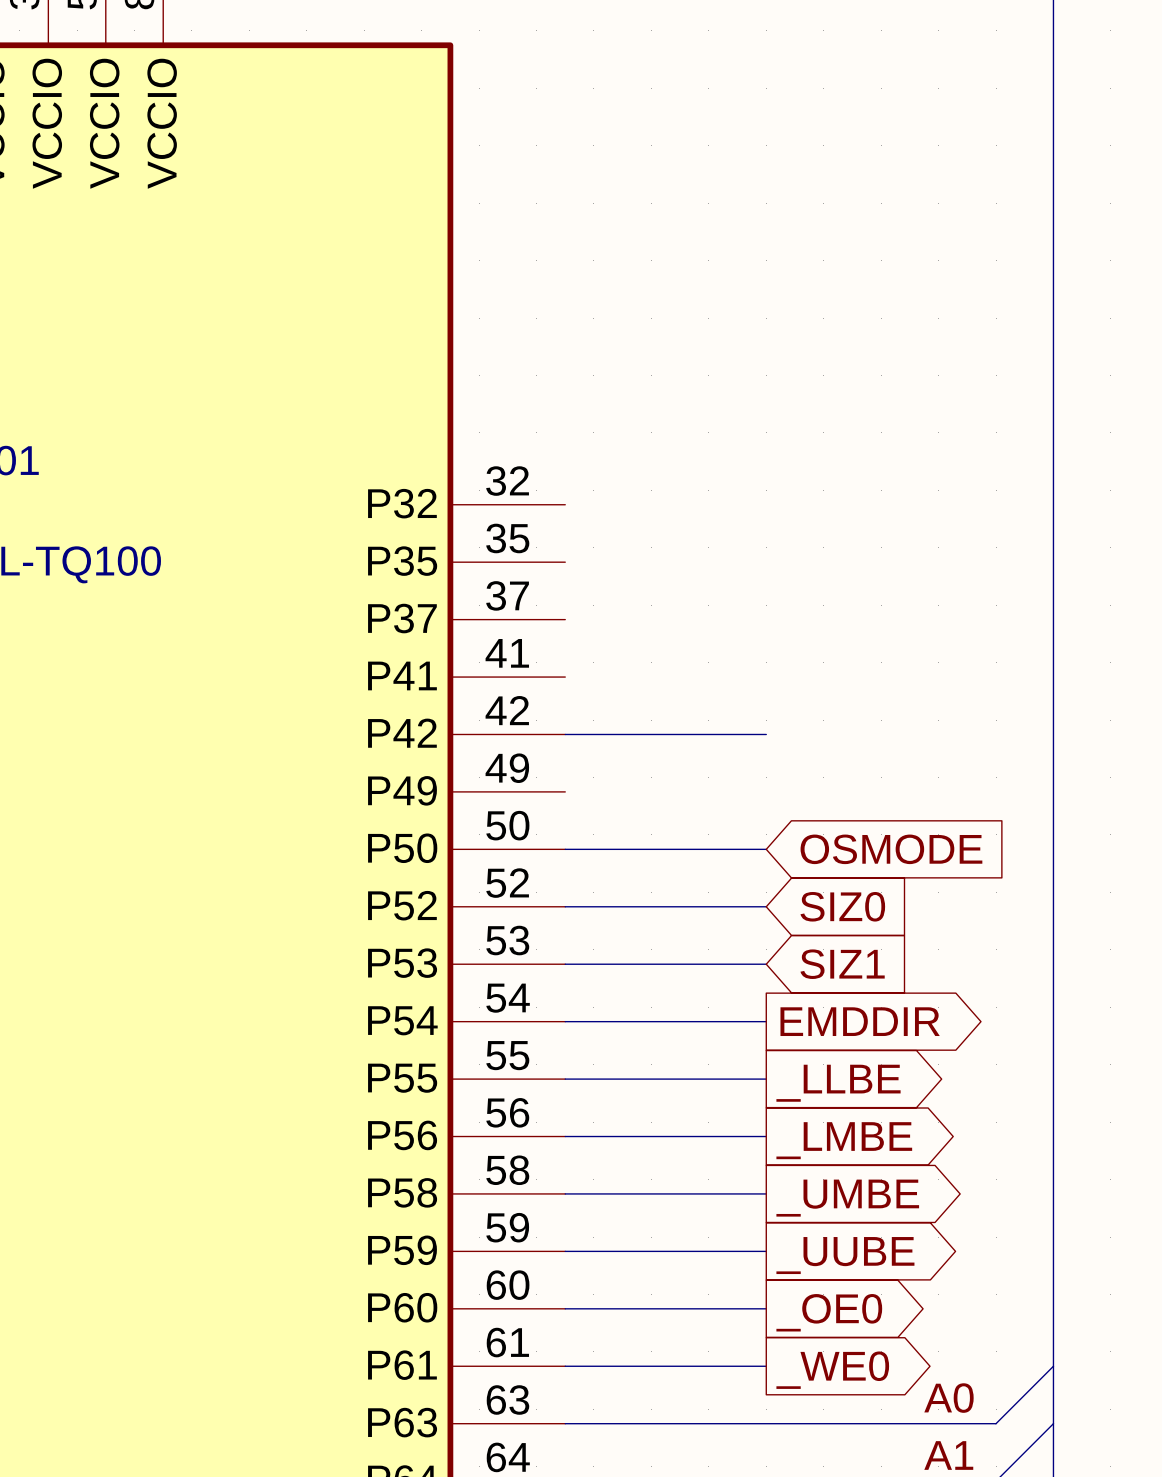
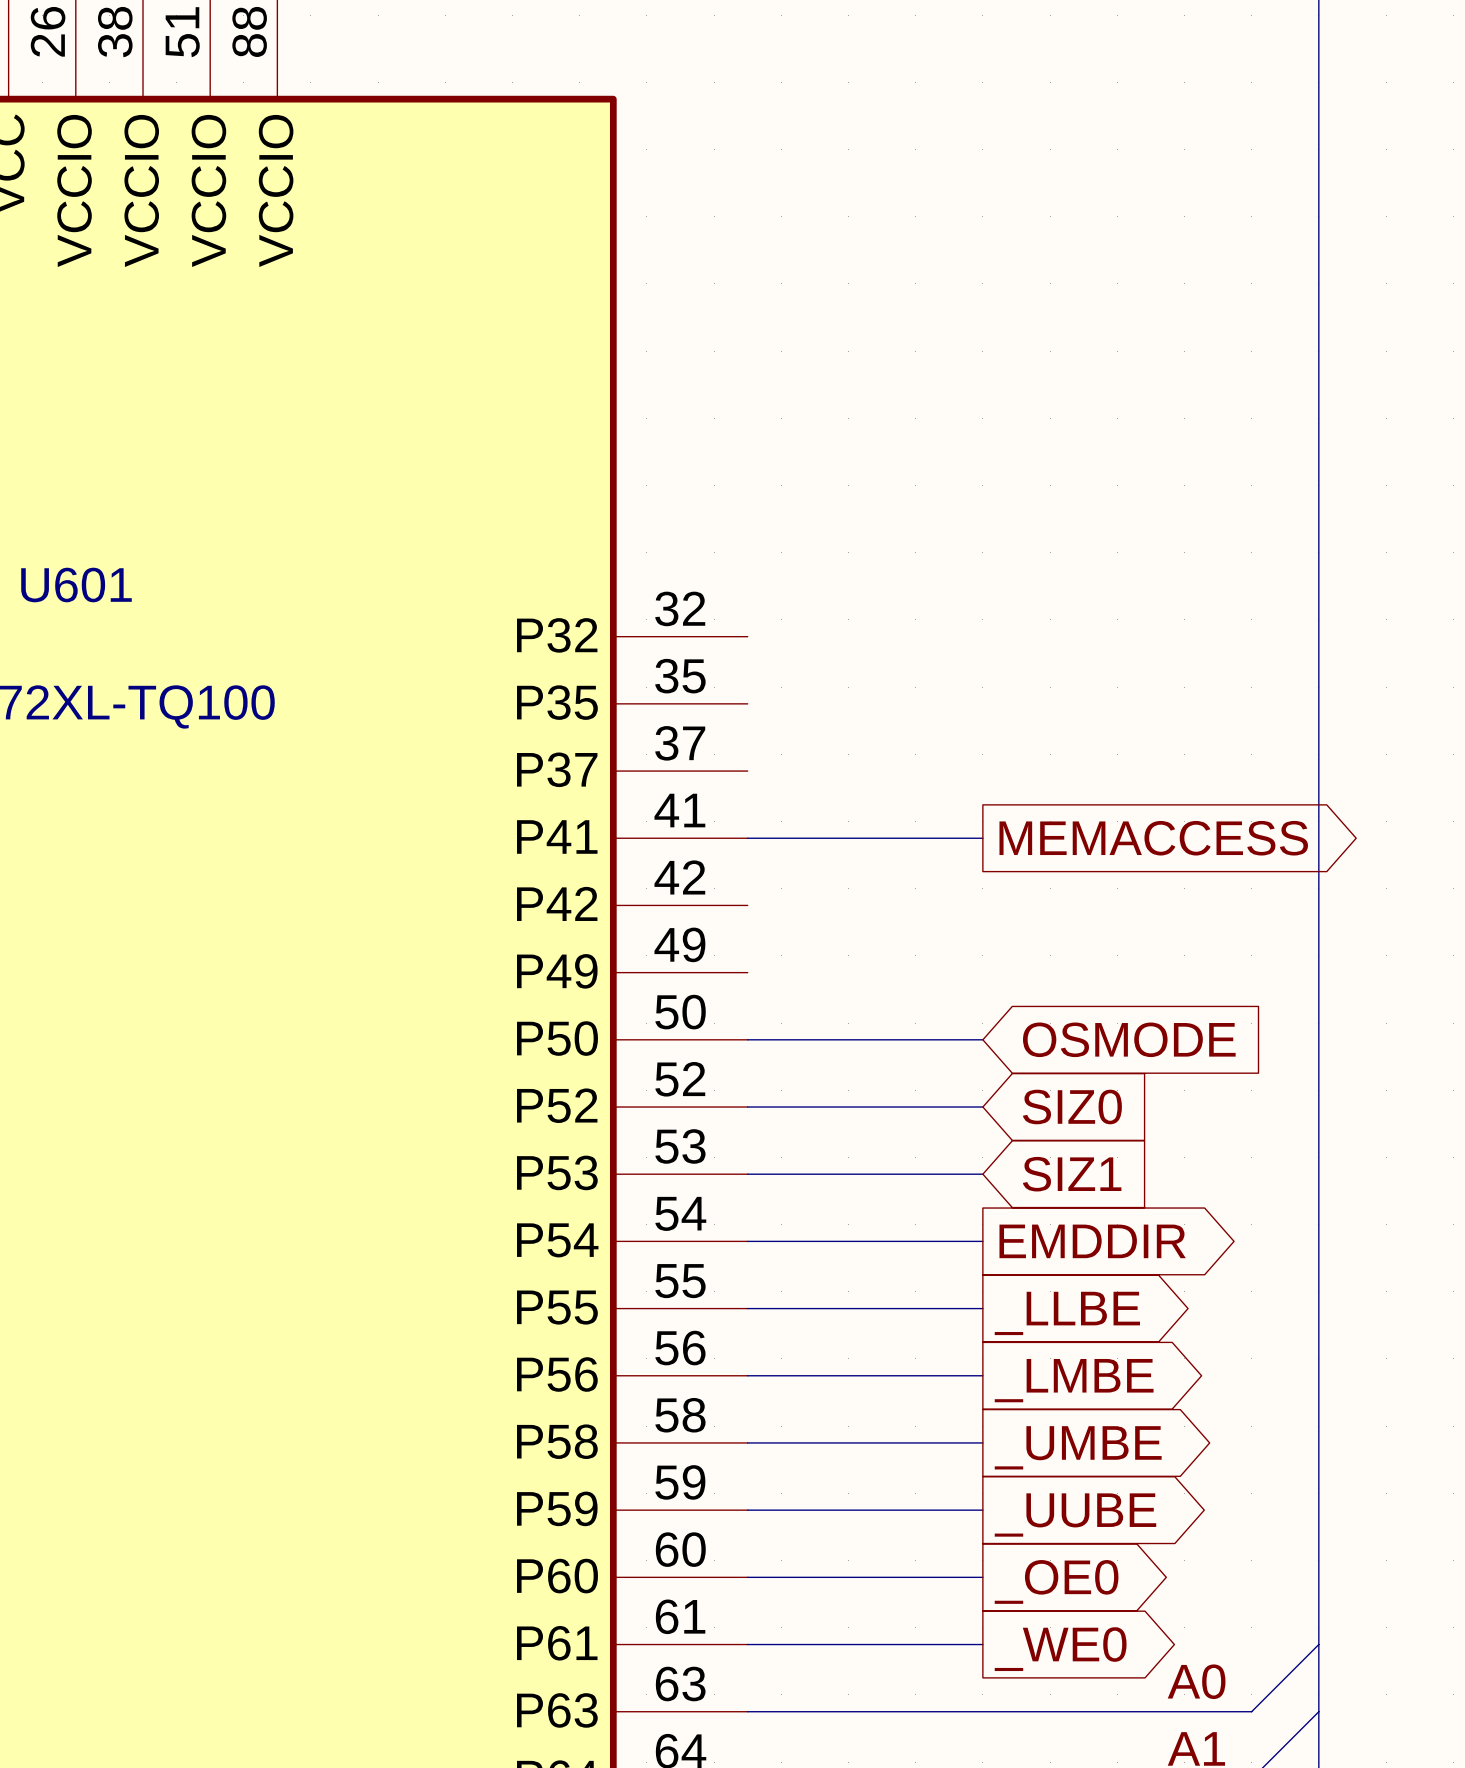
global label: none -> MEMACCESS (1153, 838)
wire: (565, 734) (766, 734) -> (747, 838) (982, 838)

